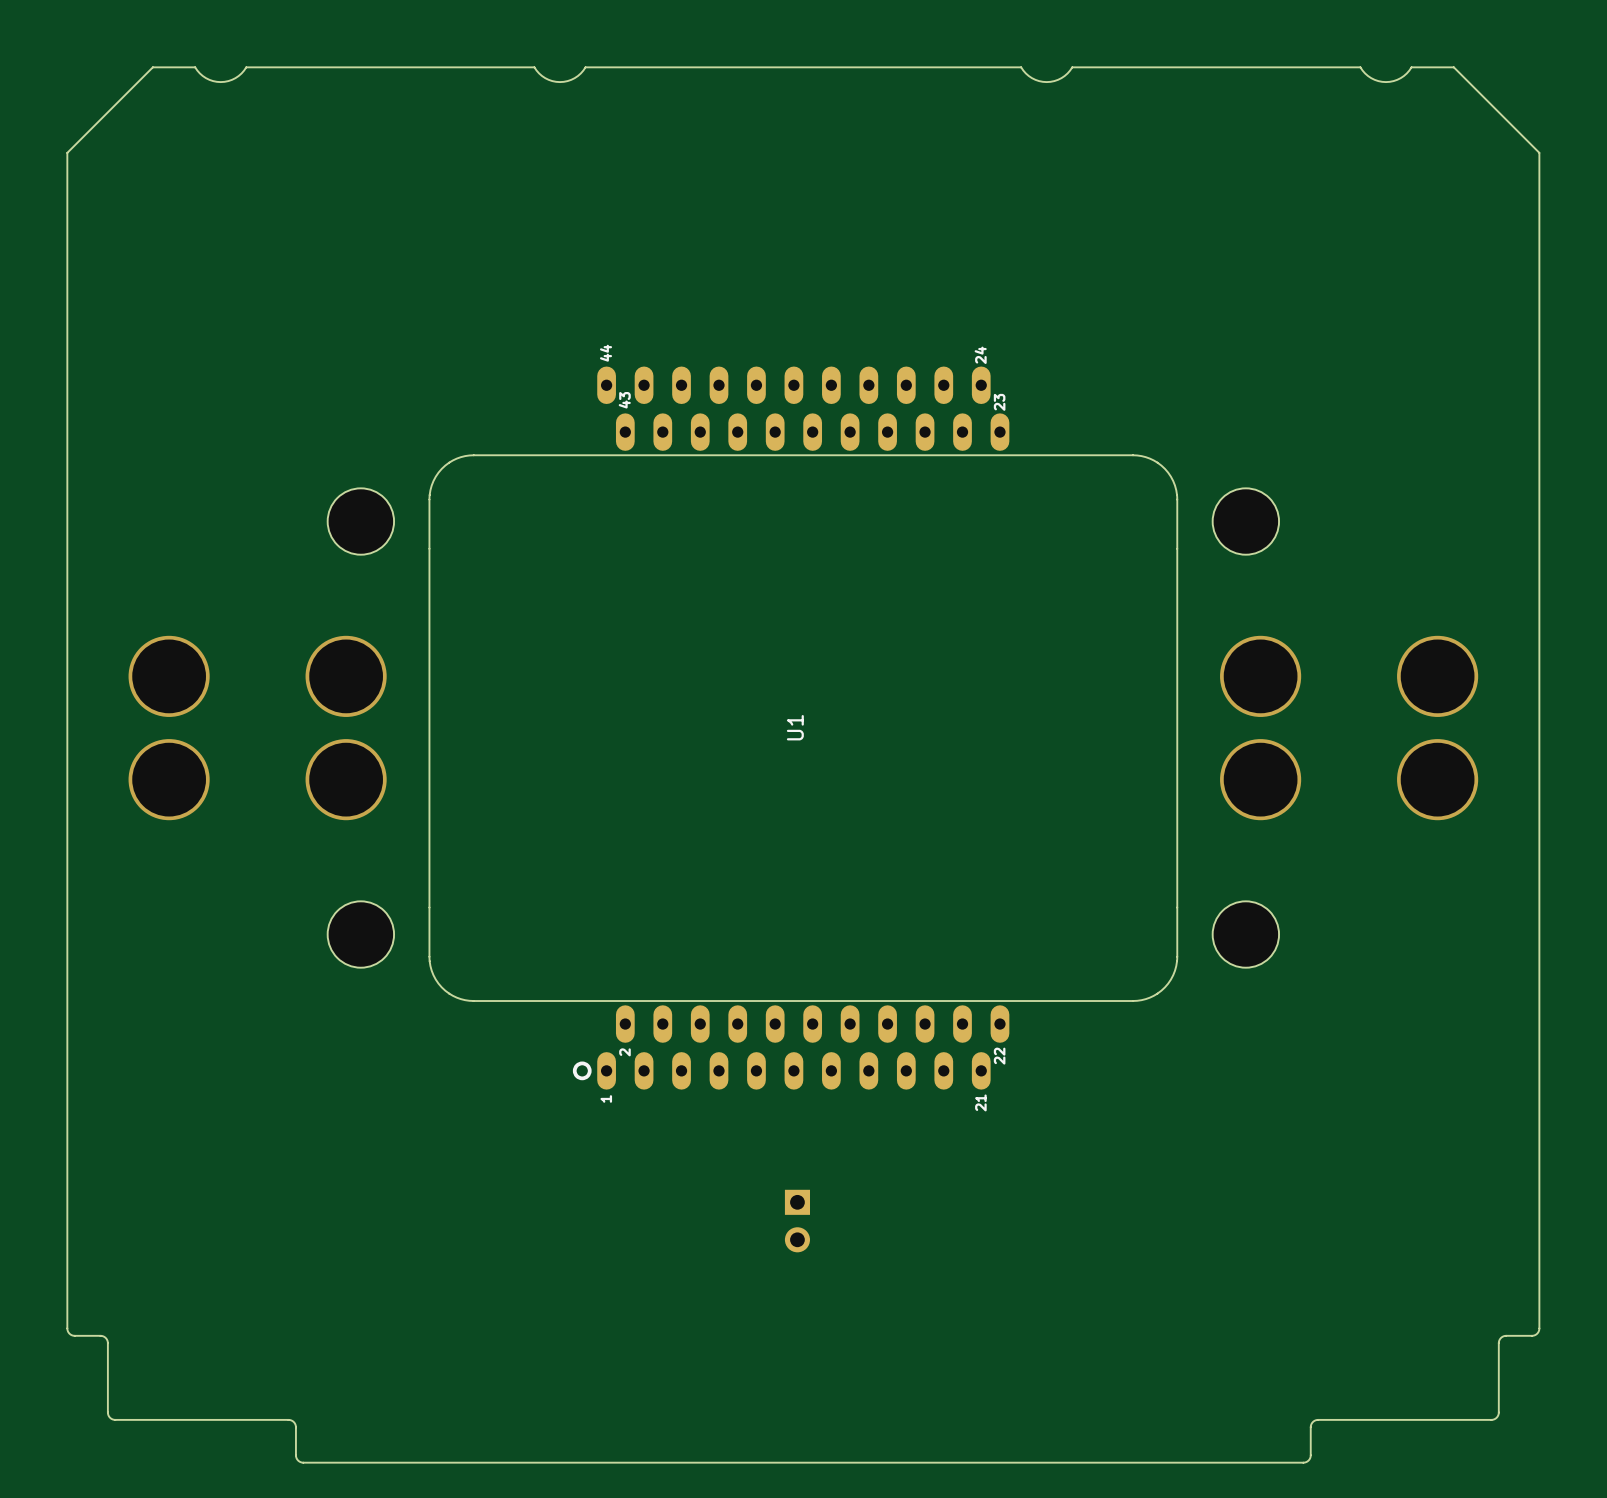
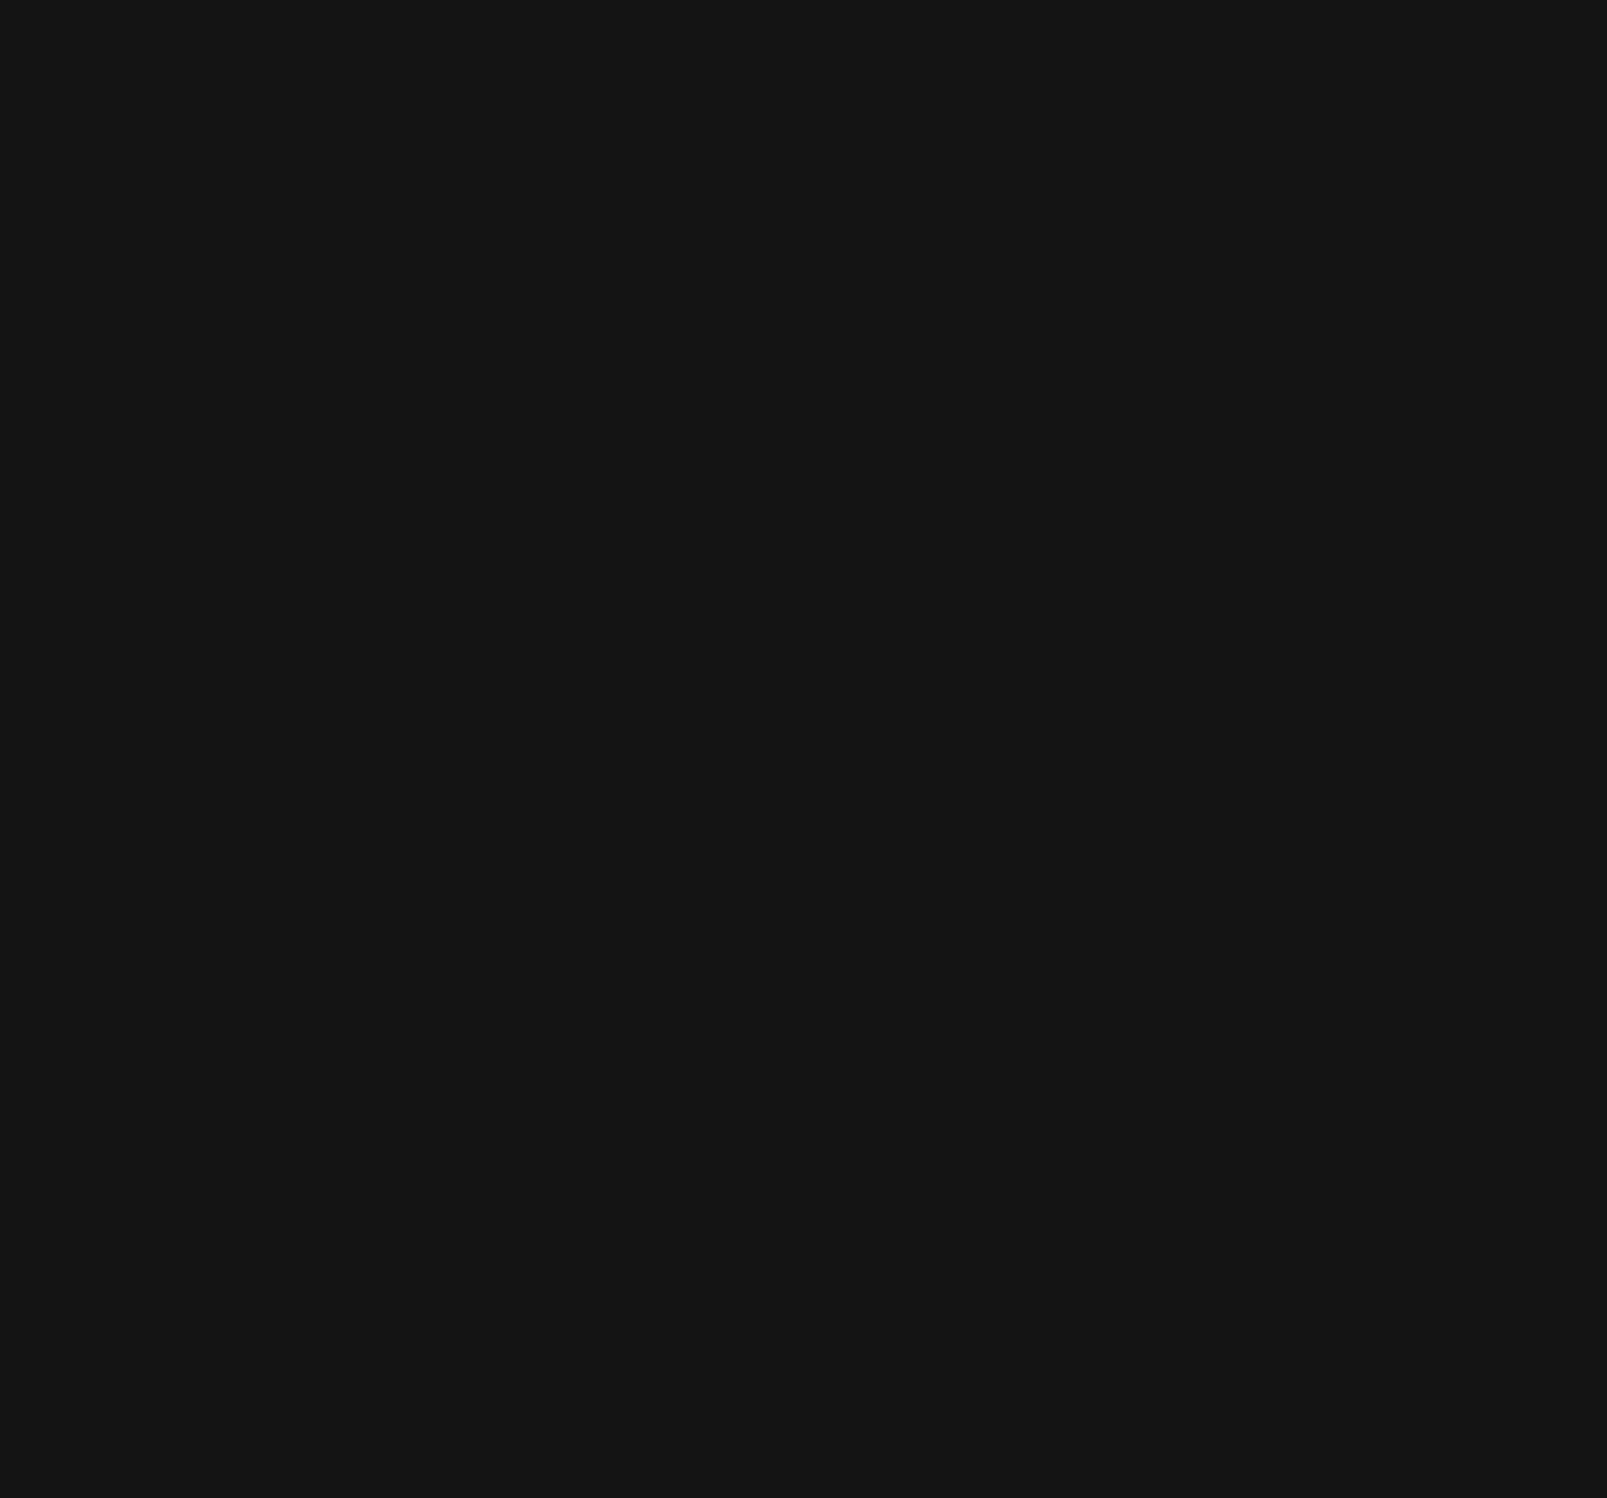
board edge: (1453, 67) (1411, 67) (1400, 78) (1385, 82) (1371, 78) (1360, 67) (1072, 67) (1061, 78) (1046, 82) (1031, 78) (1021, 67) (585, 67) (574, 78) (559, 82) (545, 78) (534, 67) (246, 67) (235, 78) (220, 82) (205, 78) (195, 67) (152, 67) (67, 152) (67, 1328) (68, 1332) (72, 1335) (101, 1335) (107, 1340) (107, 1412) (110, 1417) (115, 1419) (290, 1420) (295, 1426) (296, 1457) (298, 1461) (303, 1462) (1303, 1462) (1307, 1461) (1310, 1457) (1310, 1426) (1316, 1420) (1491, 1419) (1496, 1417) (1498, 1412) (1499, 1340) (1505, 1335) (1533, 1335) (1537, 1332) (1539, 1328) (1539, 152) (1453, 67) -> none
board edge: (1133, 455) (473, 455) (456, 458) (445, 465) (433, 480) (429, 499) (429, 956) (431, 970) (438, 983) (452, 995) (473, 1001) (1133, 1001) (1149, 997) (1161, 990) (1173, 975) (1177, 958) (1177, 497) (1173, 480) (1164, 468) (1149, 458) (1133, 455) -> none
part: (360, 521) -> none
part: (1245, 521) -> none
via: (169, 676) -> none
via: (346, 676) -> none
via: (1260, 676) -> none
via: (1437, 676) -> none
U1: (791, 728) -> none
via: (169, 779) -> none
via: (346, 779) -> none
via: (1260, 779) -> none
via: (1437, 779) -> none
part: (360, 934) -> none
part: (1245, 934) -> none
part: (797, 1221) -> none

